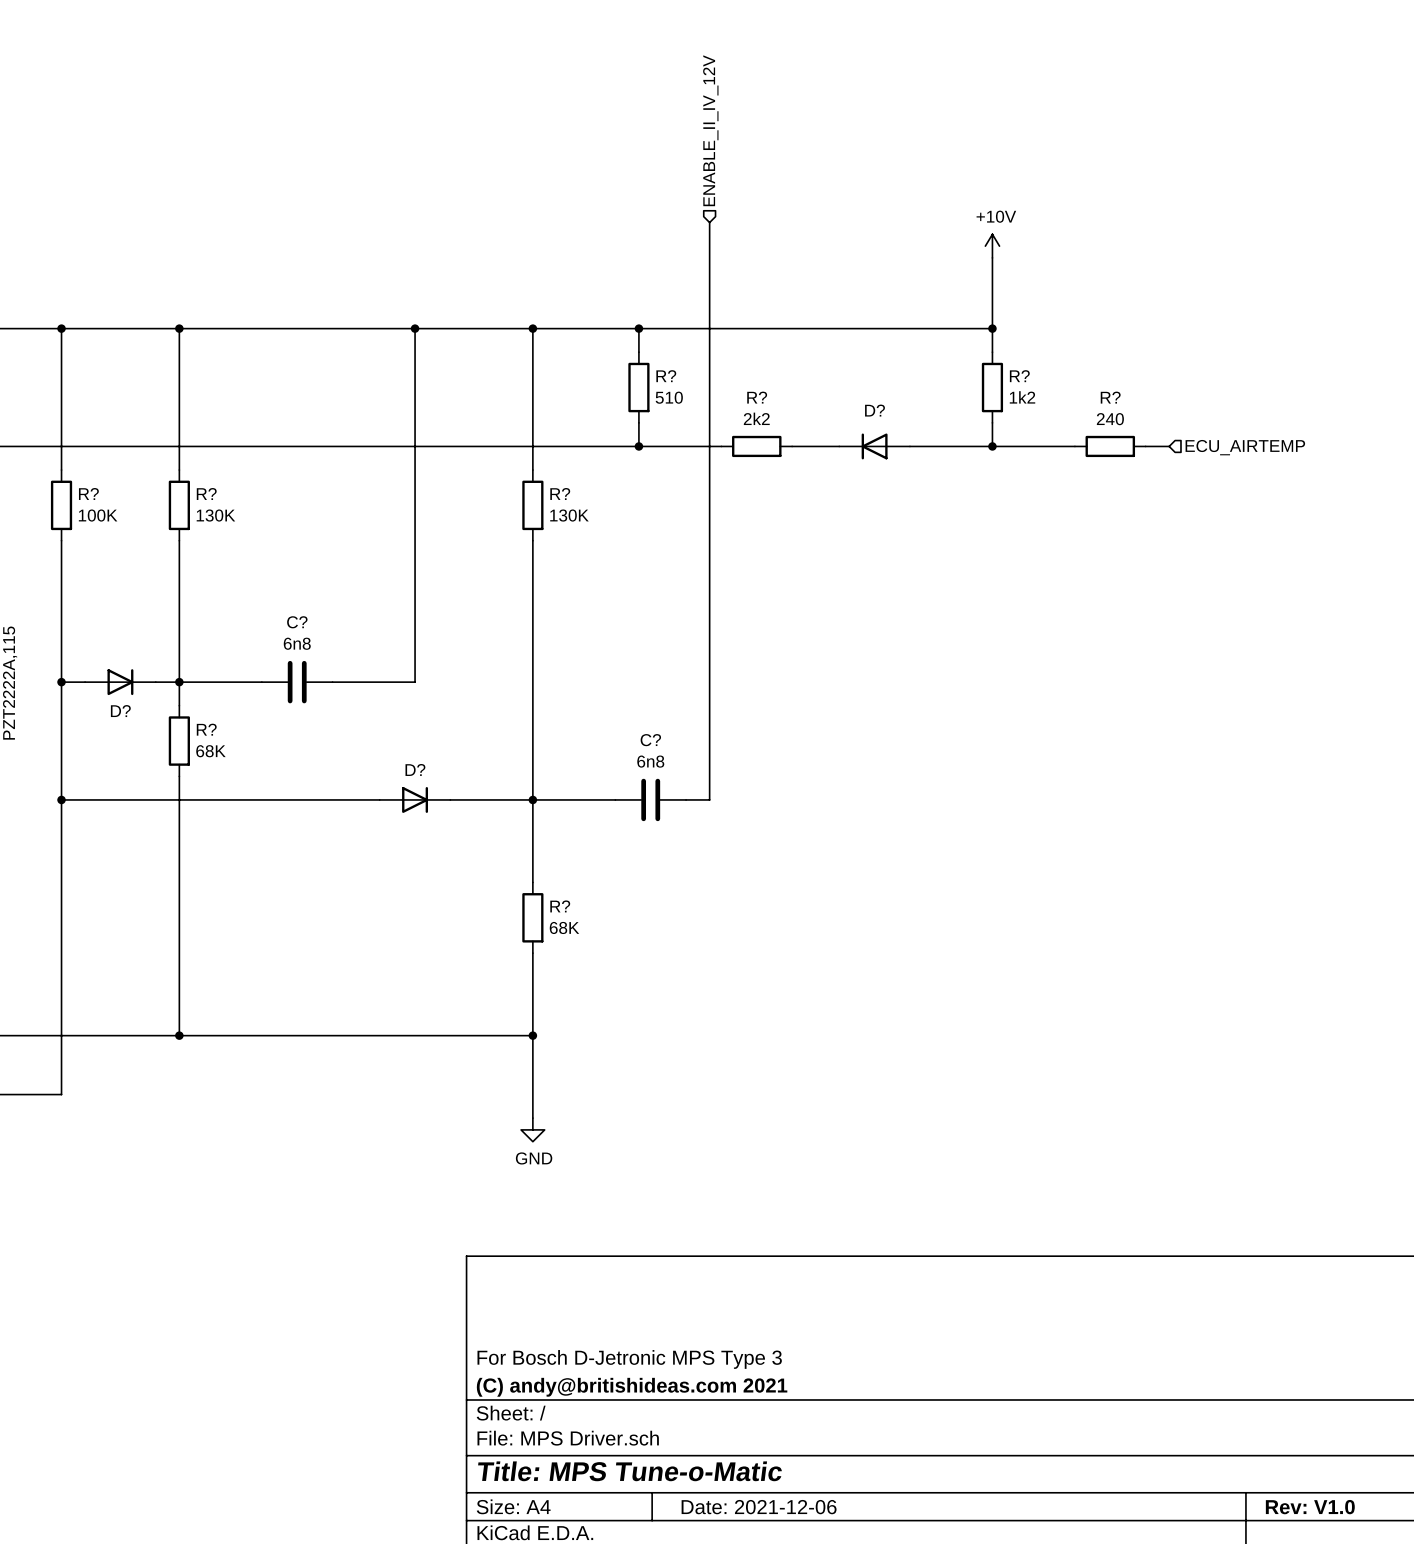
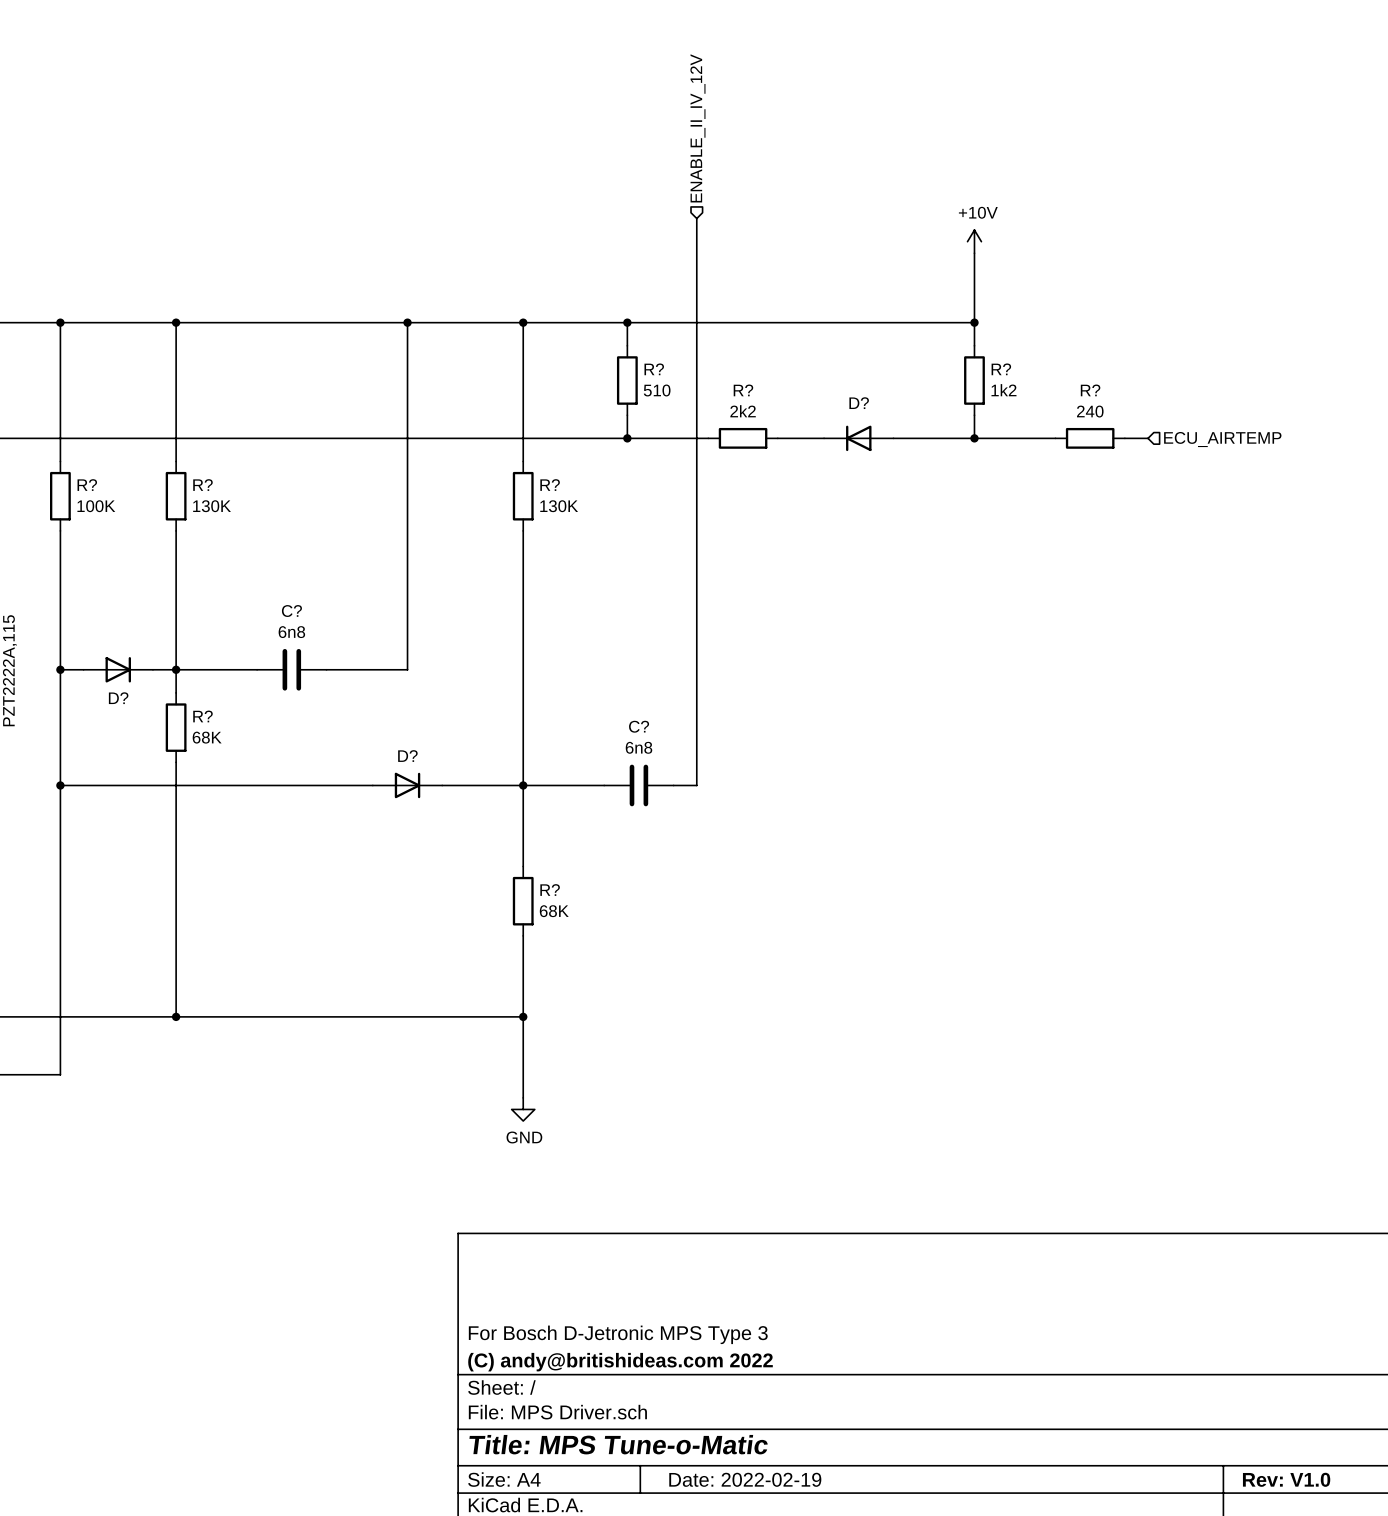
title block: (C) andy@britishideas.com 2021 (632, 1387) -> (C) andy@britishideas.com 2022 (620, 1362)
title block: Date: 2021-12-06 (759, 1507) -> Date: 2022-02-19 (745, 1479)

